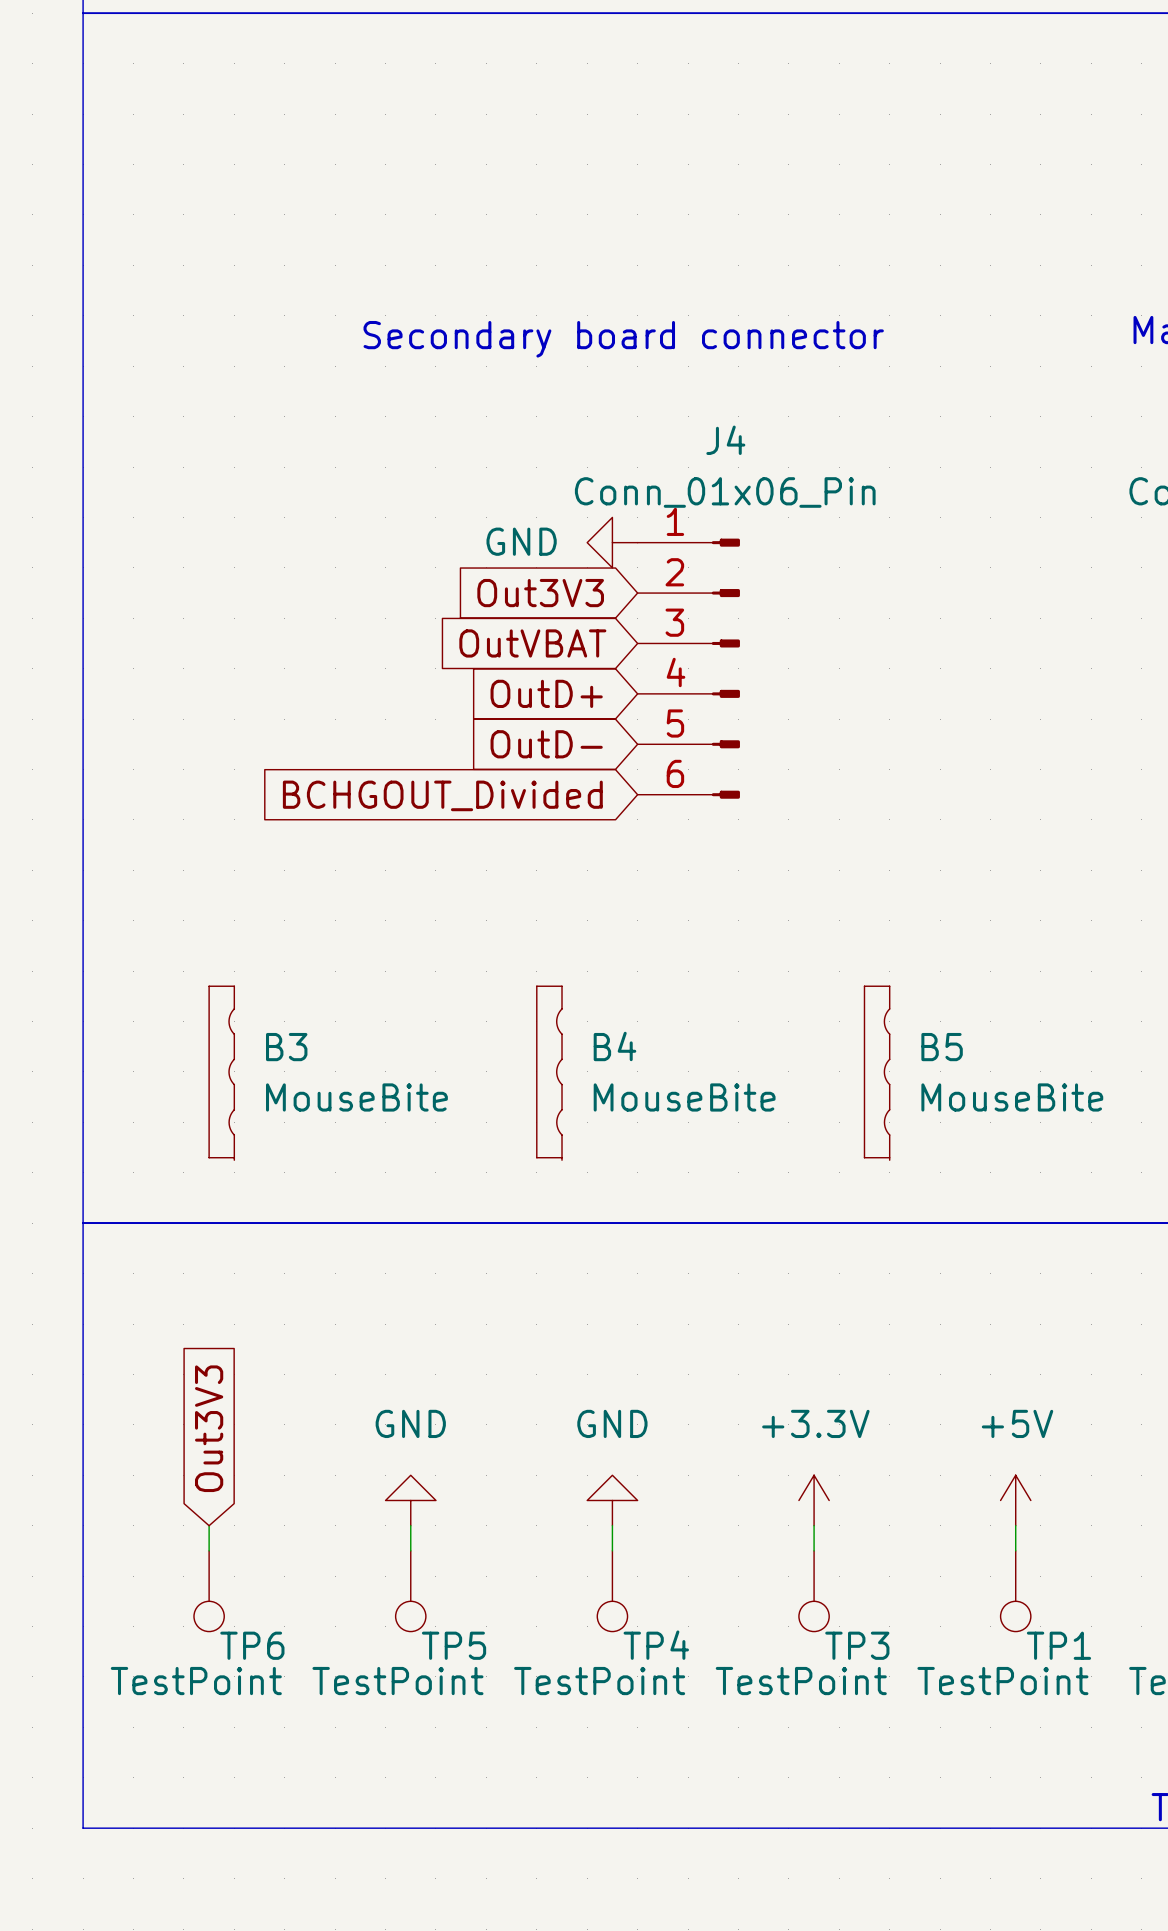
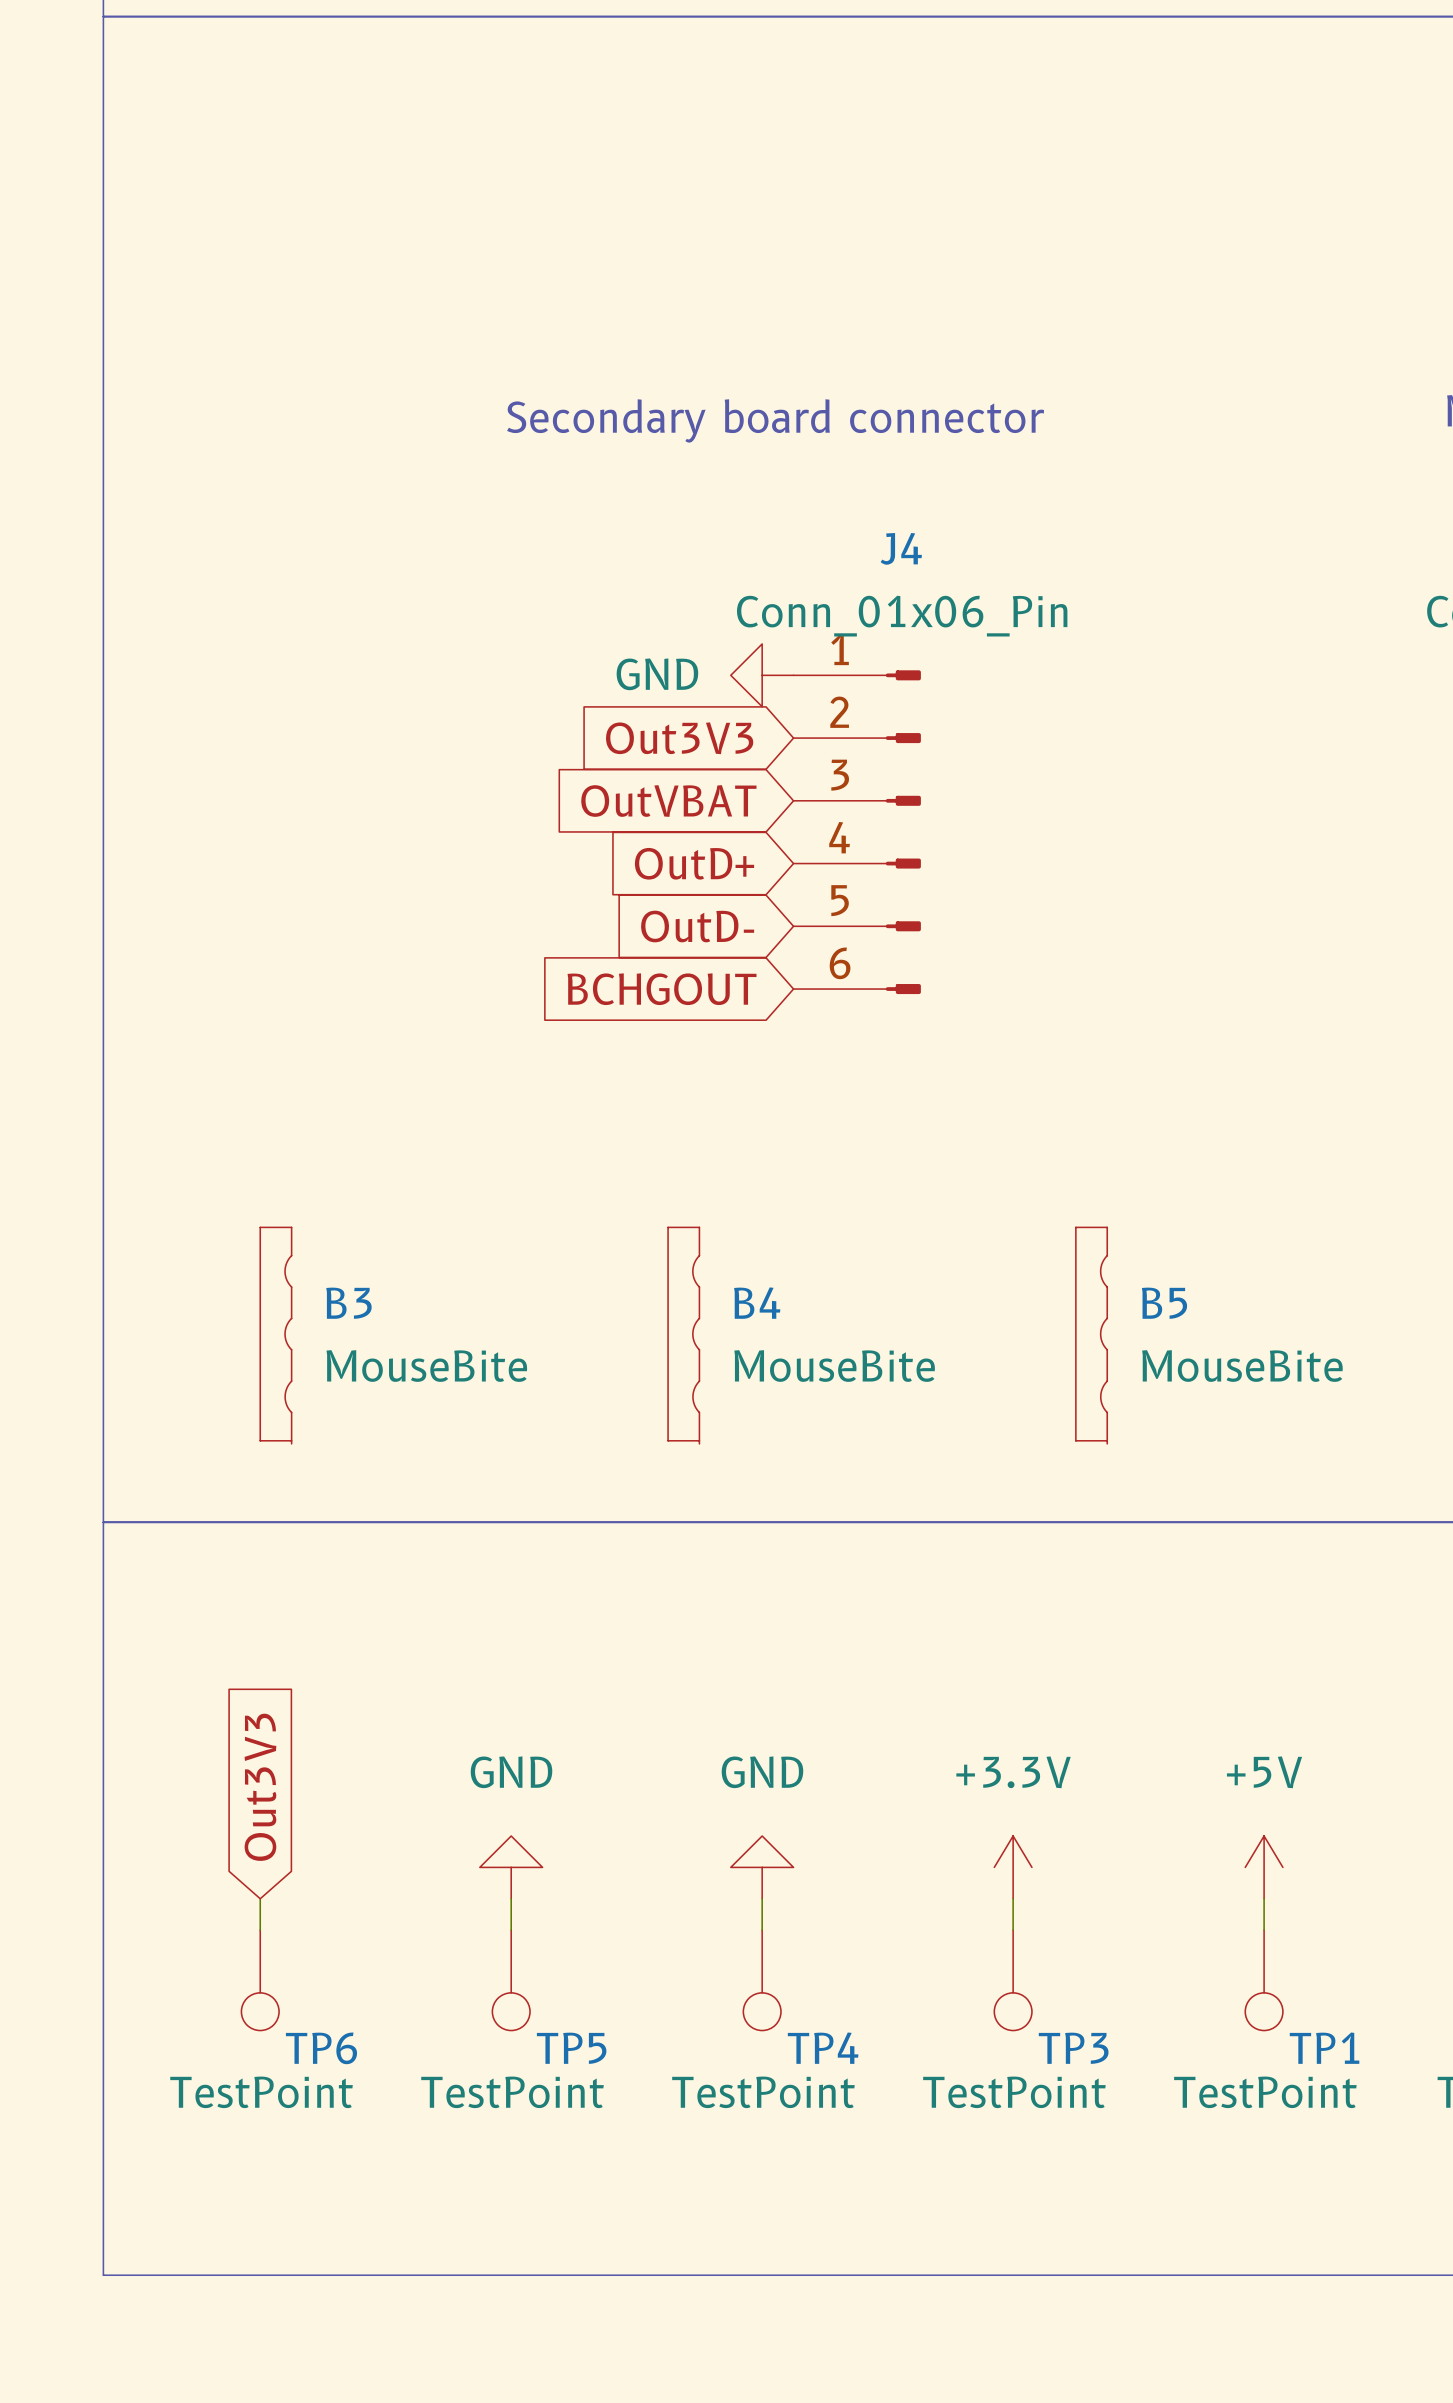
global label: BCHGOUT_Divided (442, 795) -> BCHGOUT (662, 989)

